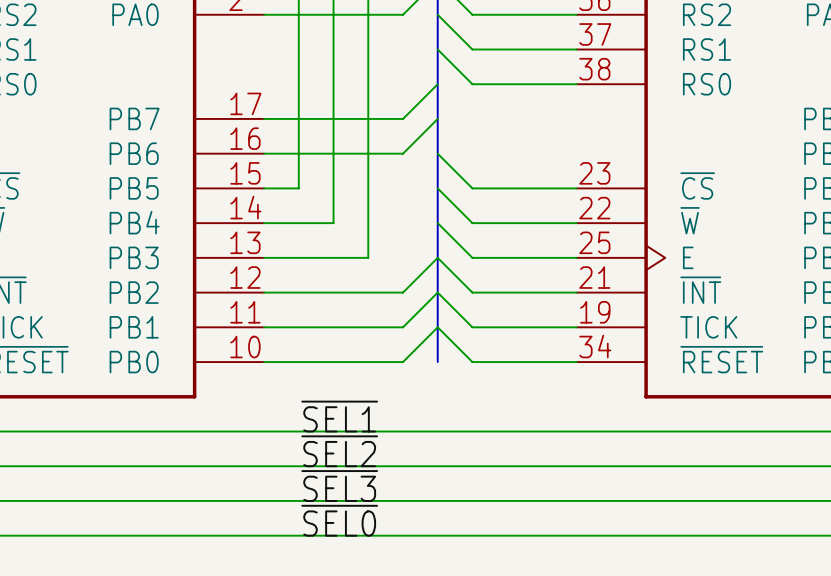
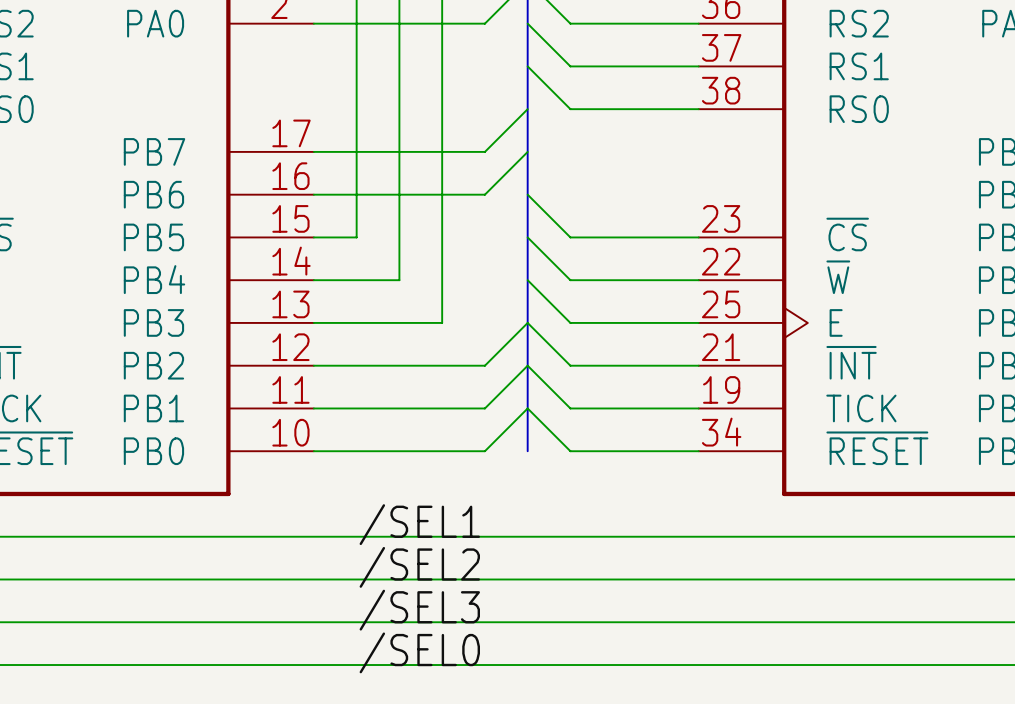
label: ~{SEL1} (339, 416) -> /SEL1 (419, 524)
label: ~{SEL2} (339, 451) -> /SEL2 (419, 567)
label: ~{SEL3} (339, 486) -> /SEL3 (419, 610)
label: ~{SEL0} (339, 520) -> /SEL0 (419, 652)

